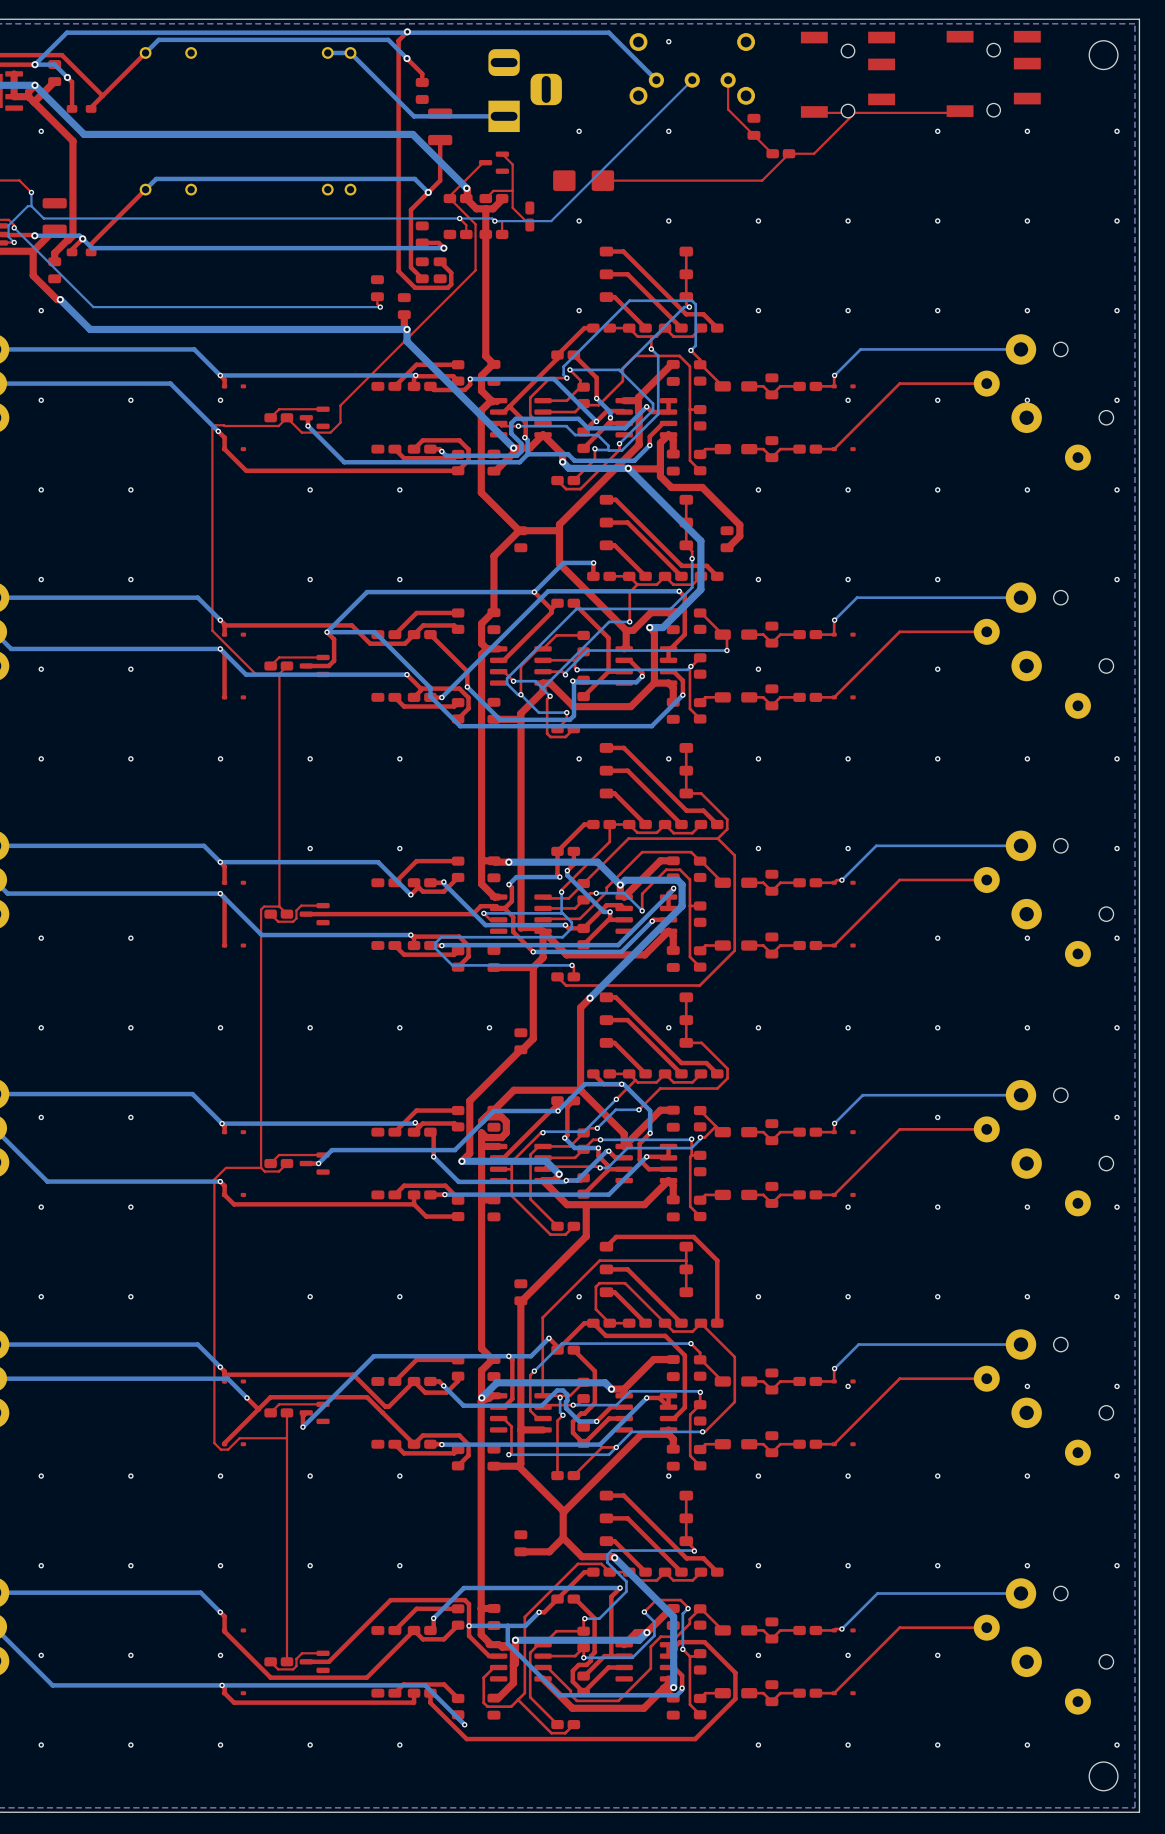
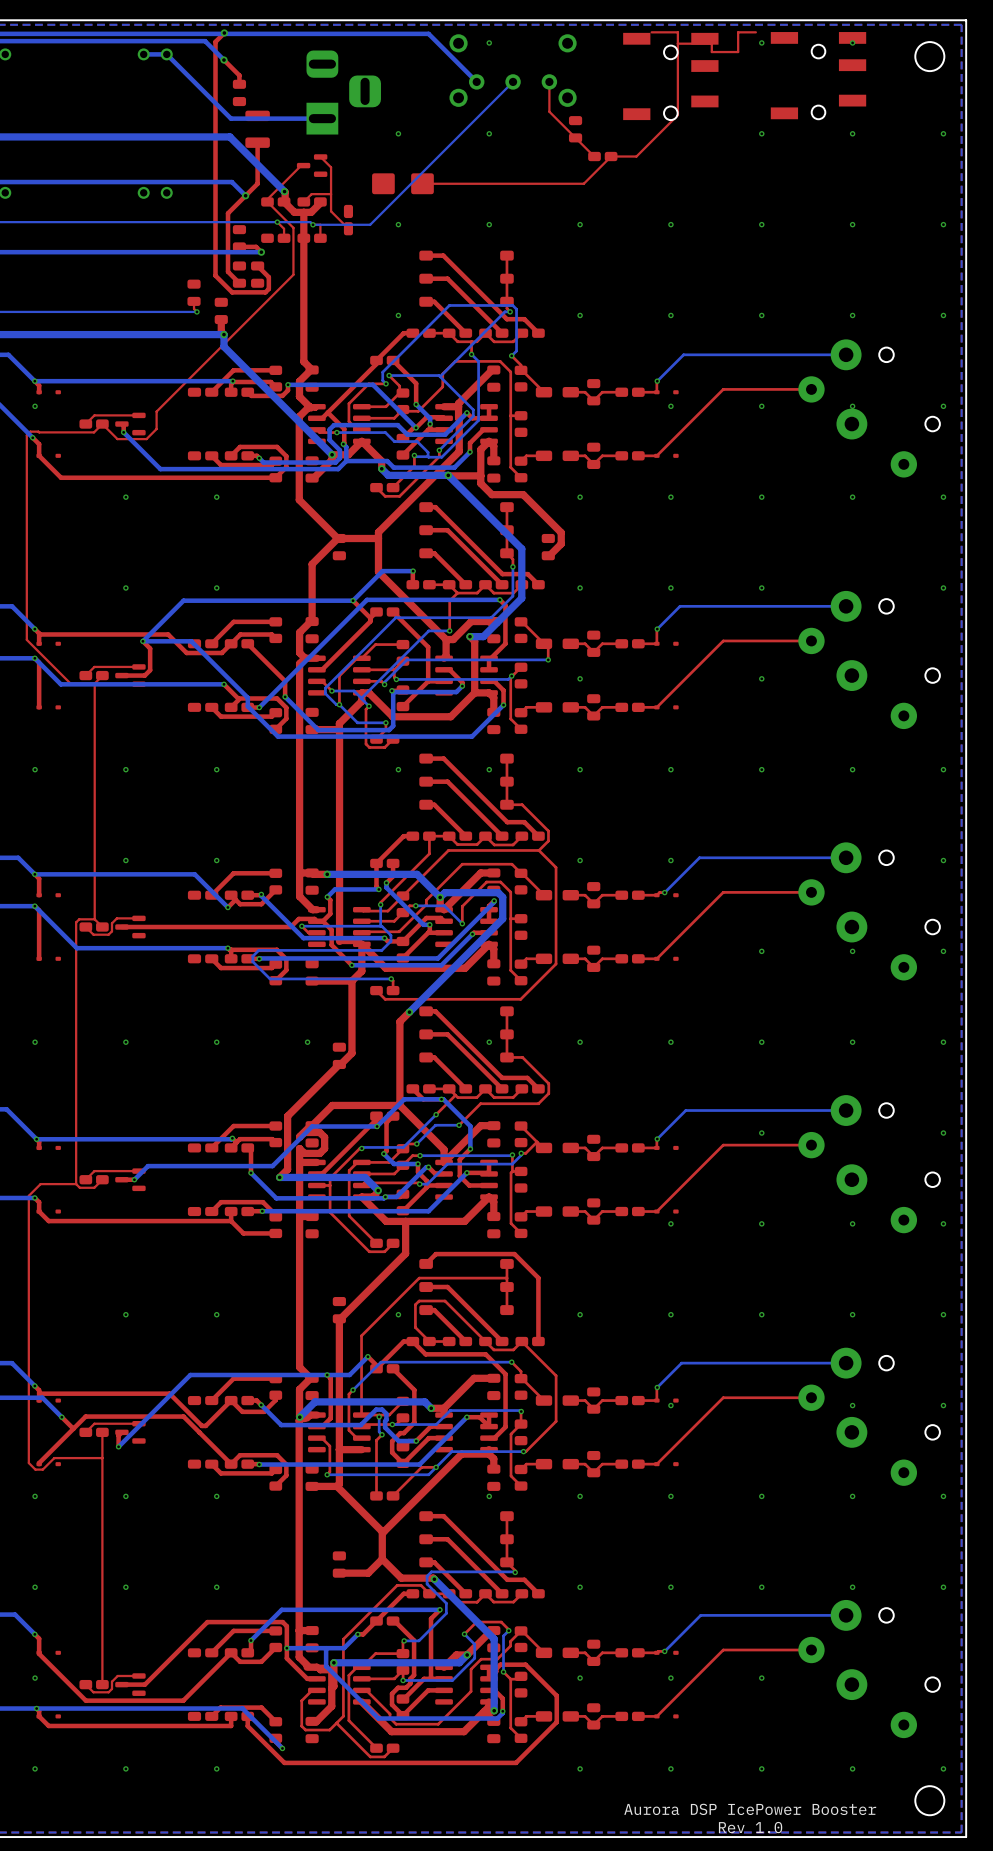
top track: none -> (651, 32) (677, 32) (677, 115)
top track: none -> (755, 32) (738, 32) (738, 52) (711, 52) (711, 43) (677, 43)
via: none -> (761, 42)
via: none -> (852, 42)
top track: (960, 111) (960, 112) (814, 111) -> none
text: none -> Aurora DSP IcePower Booster (750, 1809)
text: none -> Rev 1.0 (750, 1827)

